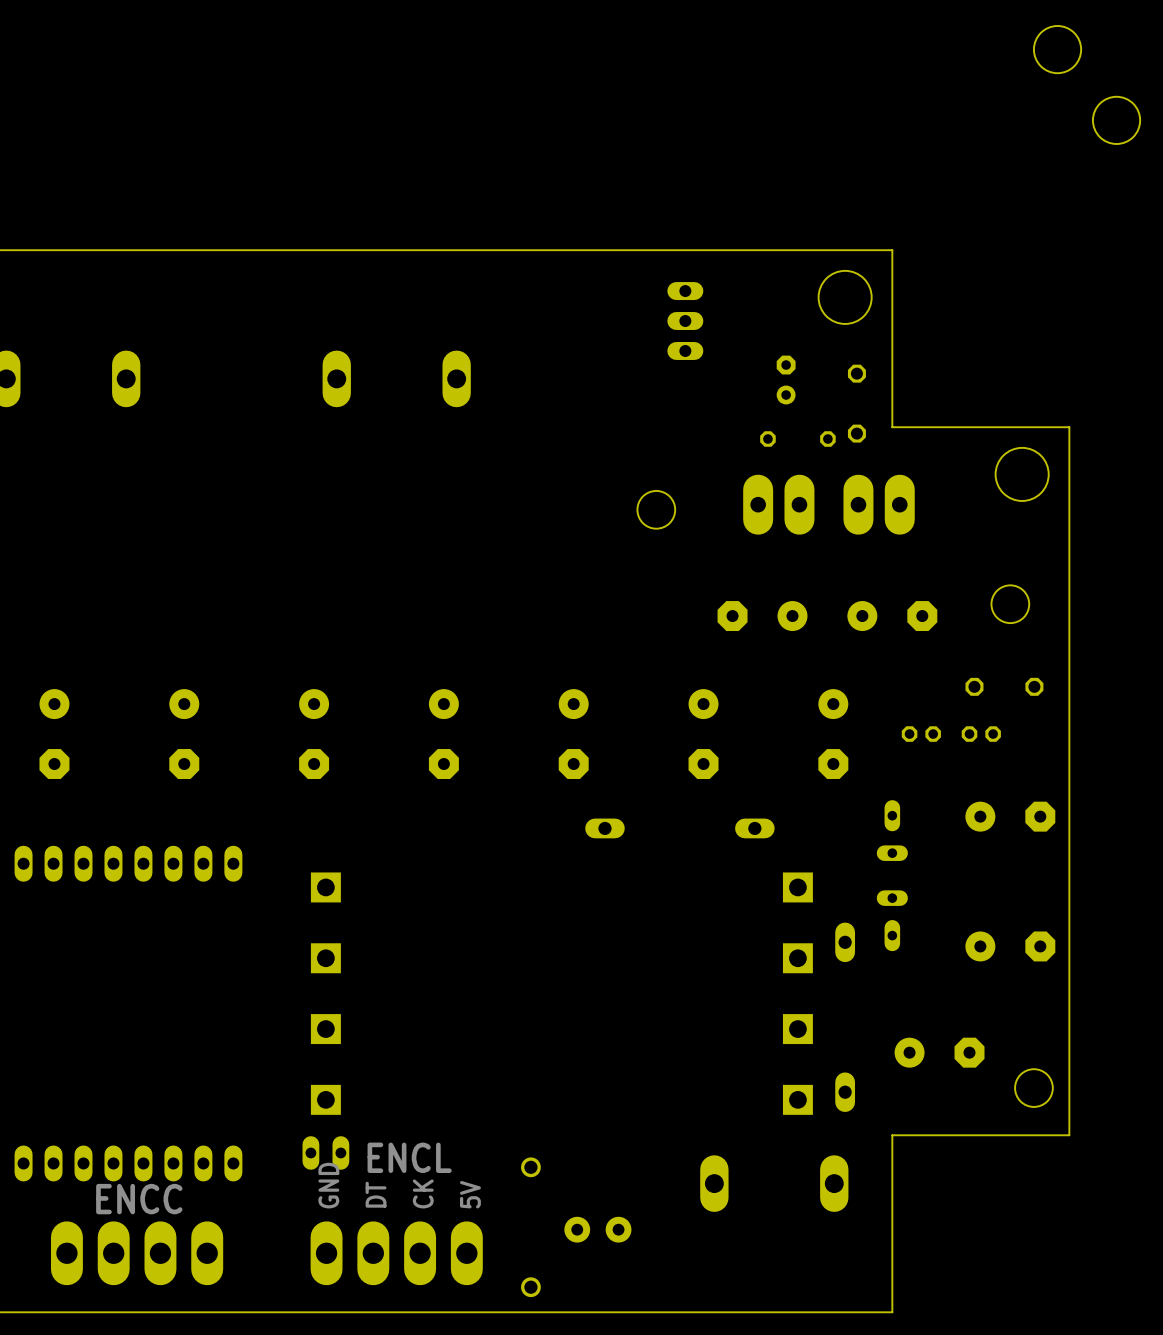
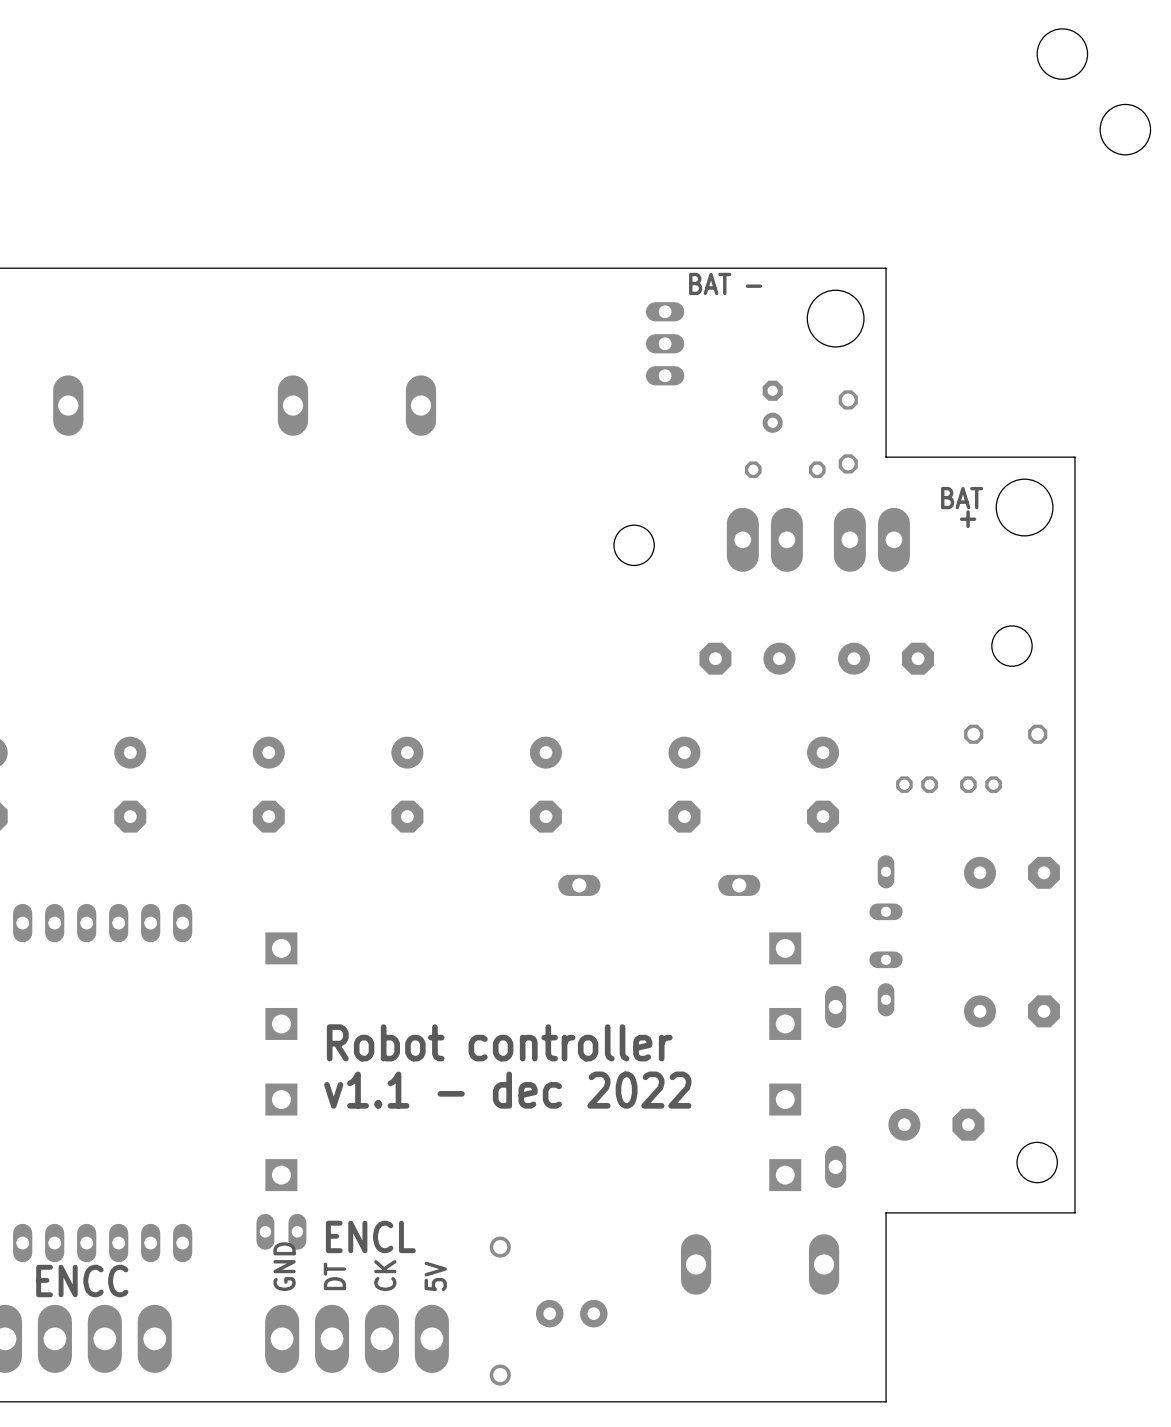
text: none -> BAT (710, 283)
text: none -> - (753, 286)
text: none -> BAT (962, 498)
text: none -> + (968, 519)
text: none -> Robot controller (499, 1042)
text: none -> v1.1 - dec 2022 (507, 1090)

